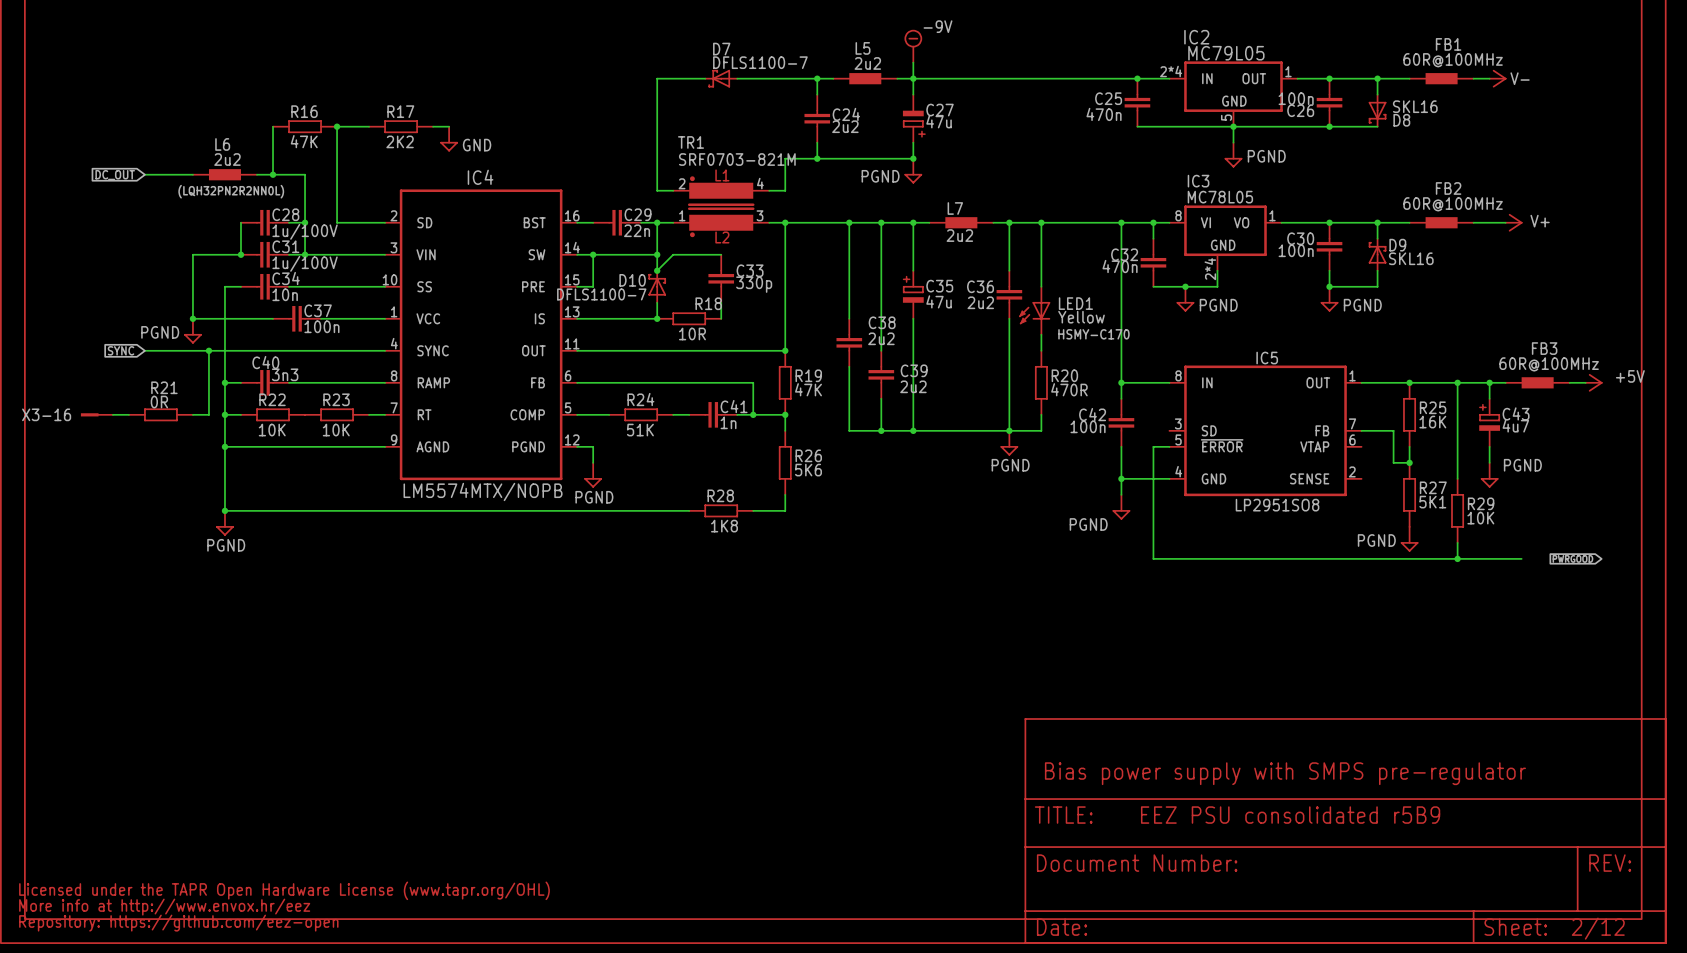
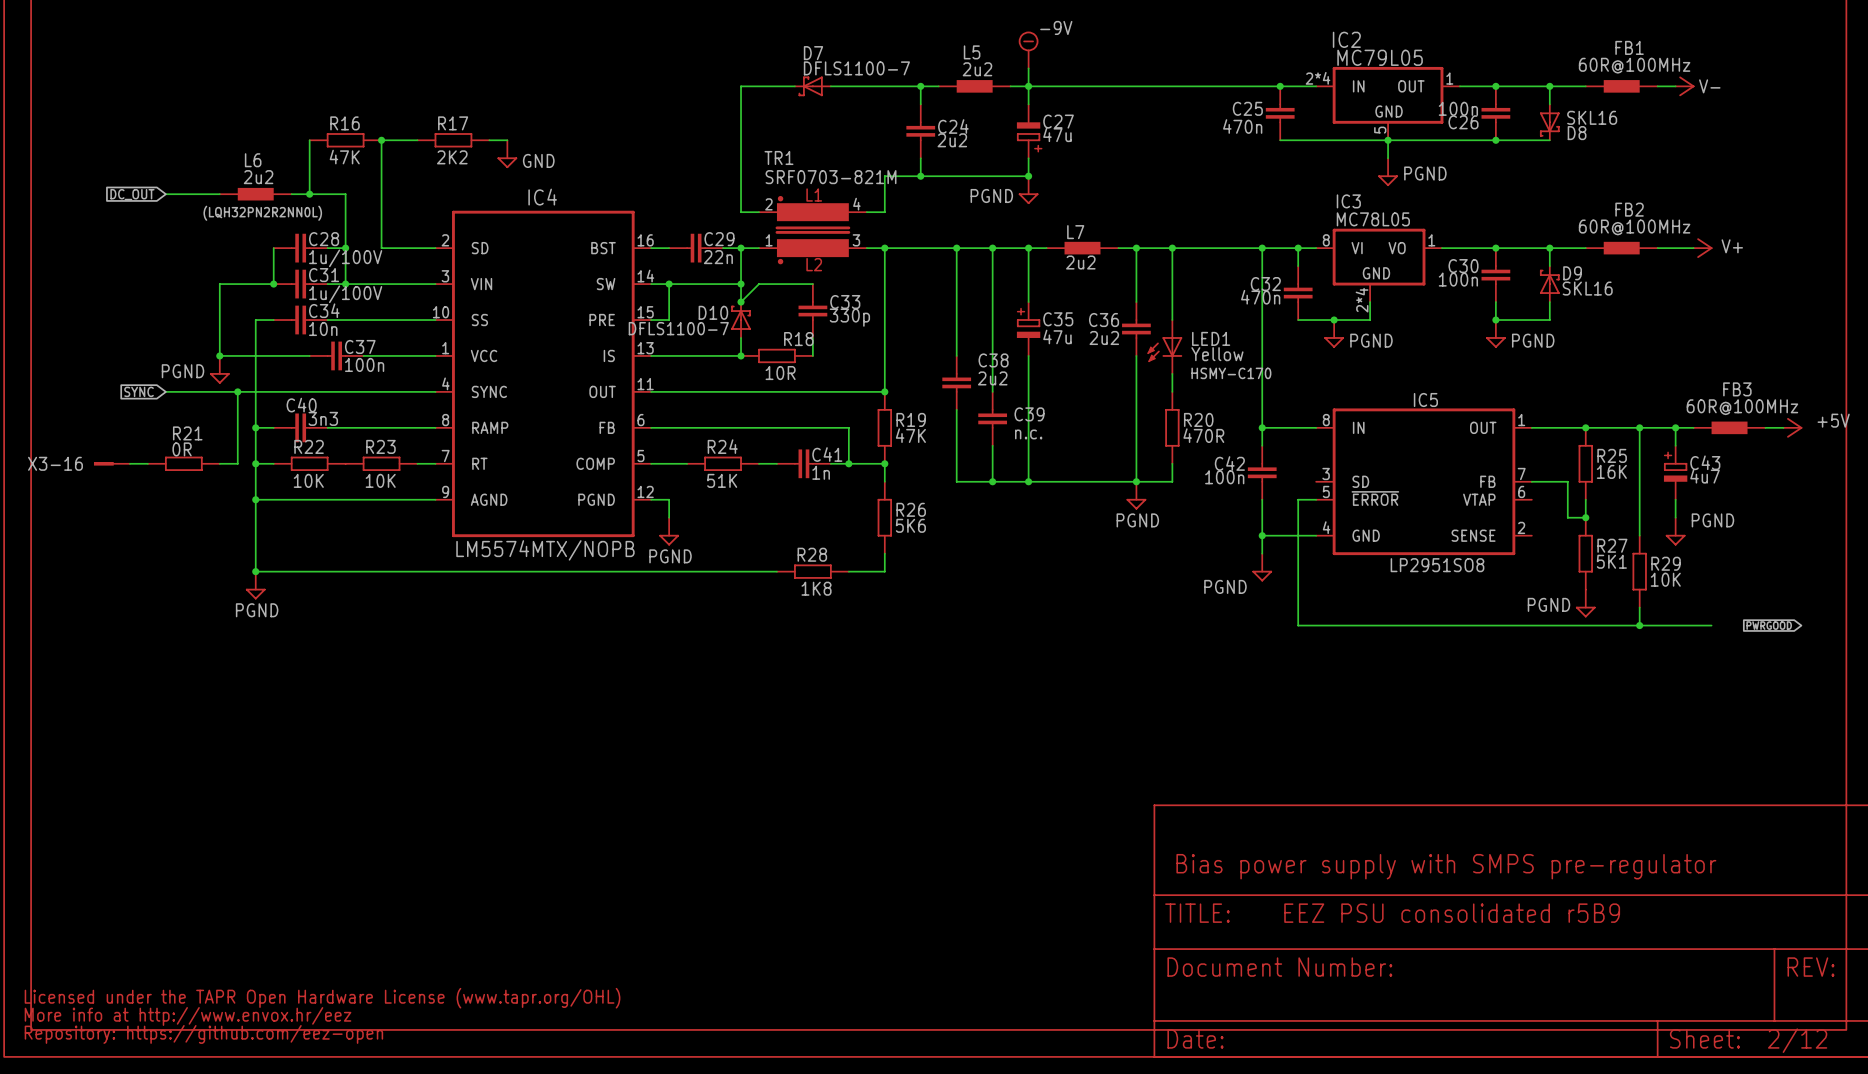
C39 value: 2u2 (913, 386) -> n.c. (1028, 434)

